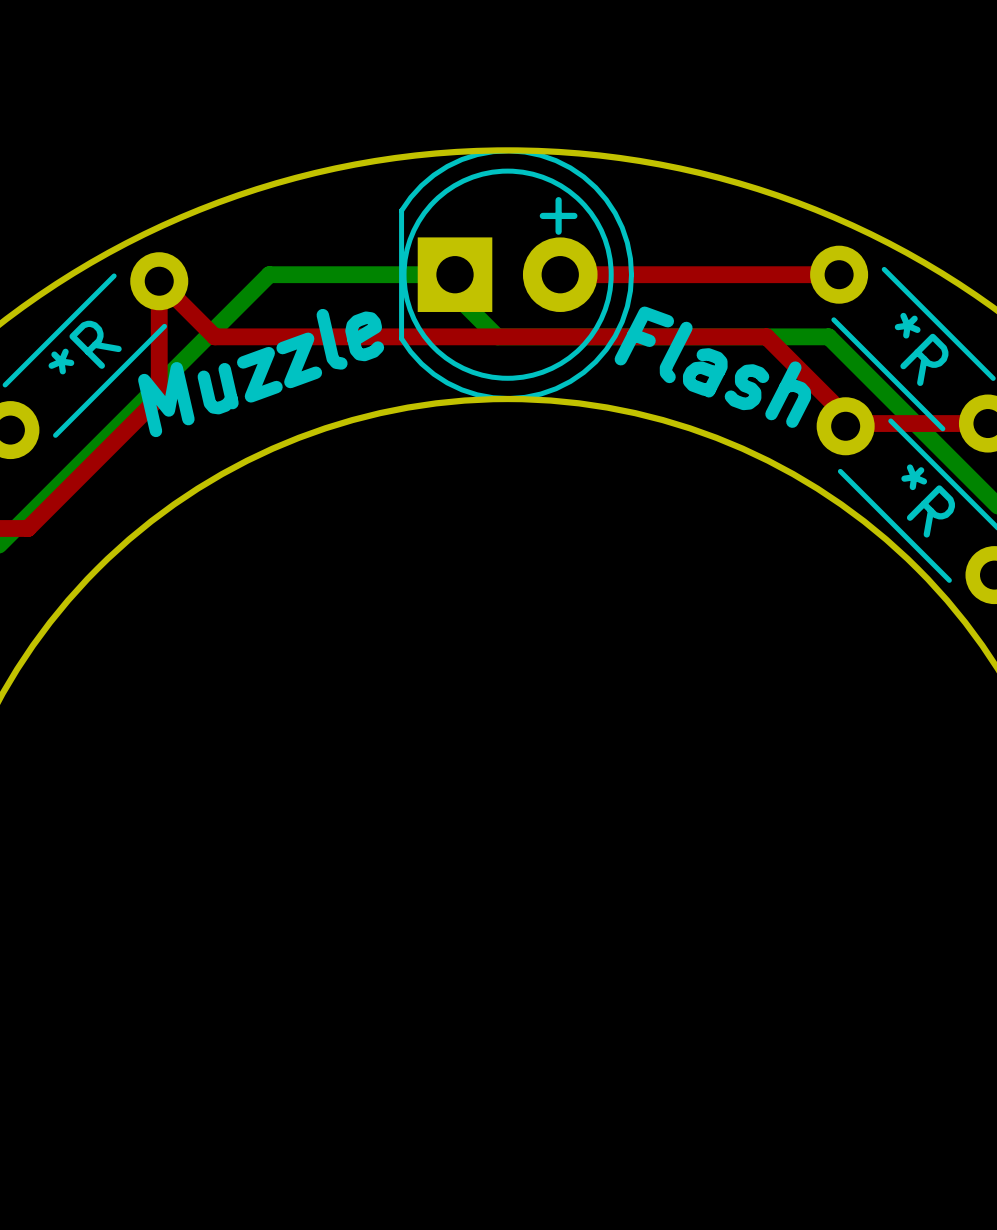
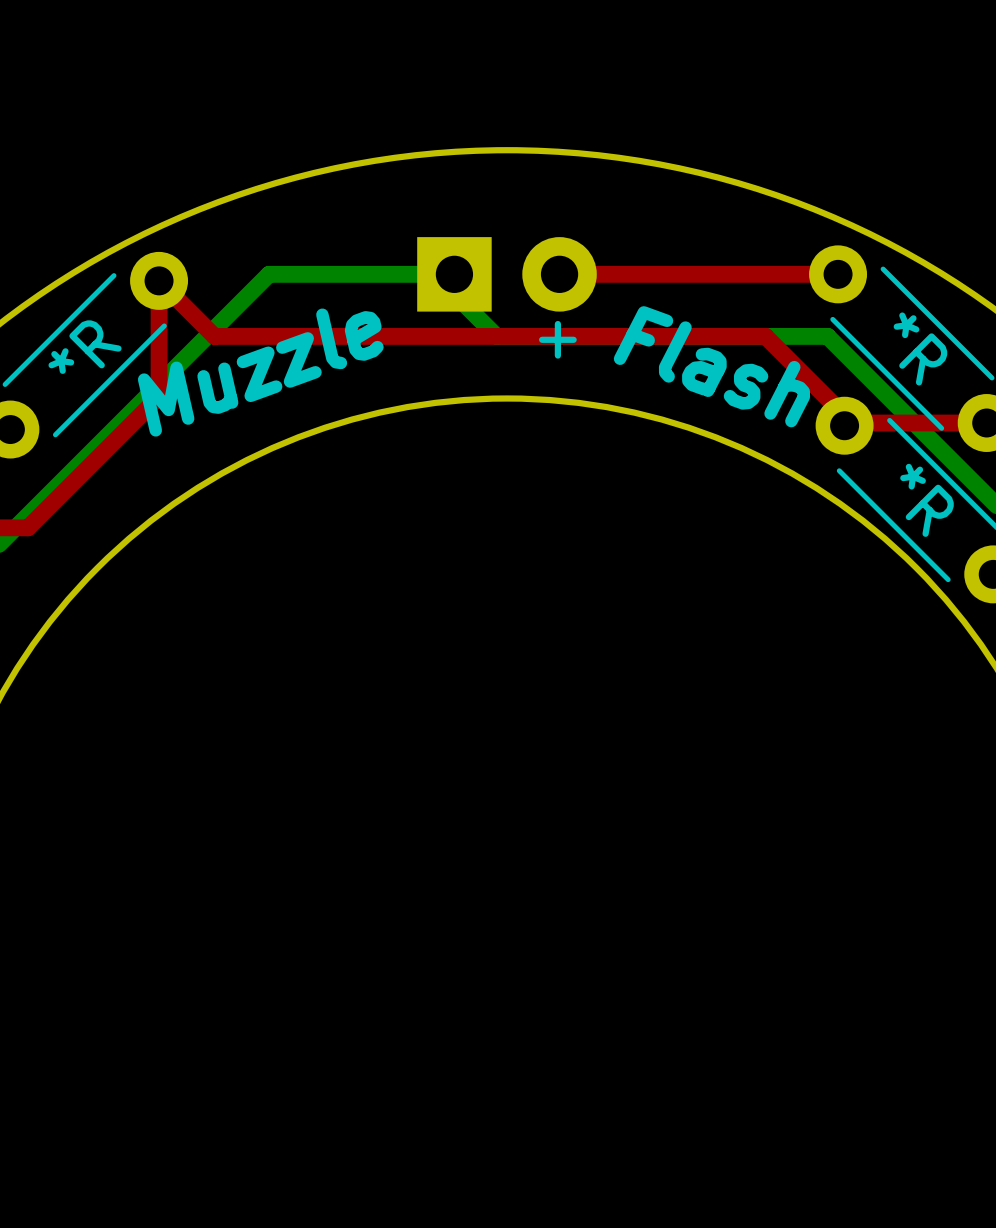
part side: top (516, 274) -> bottom (506, 274)

